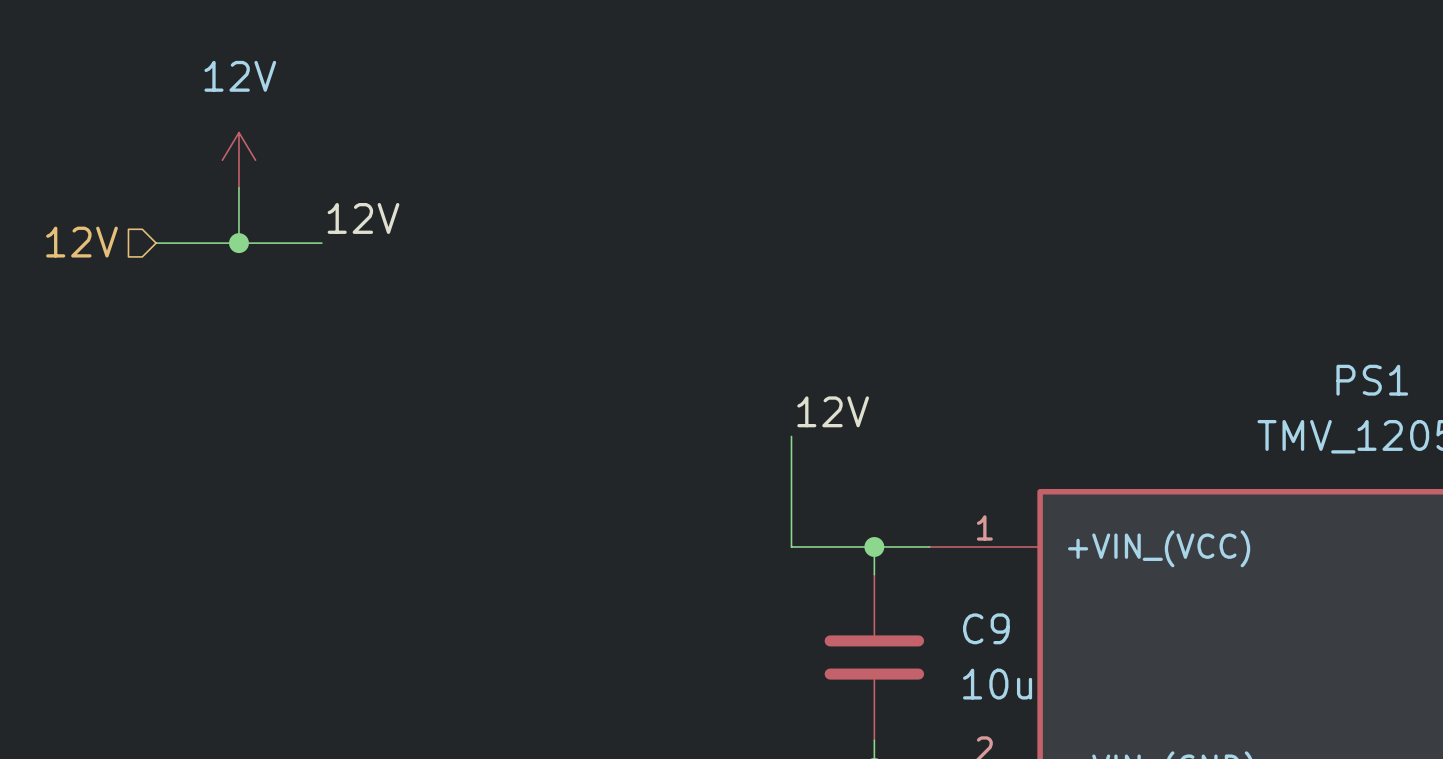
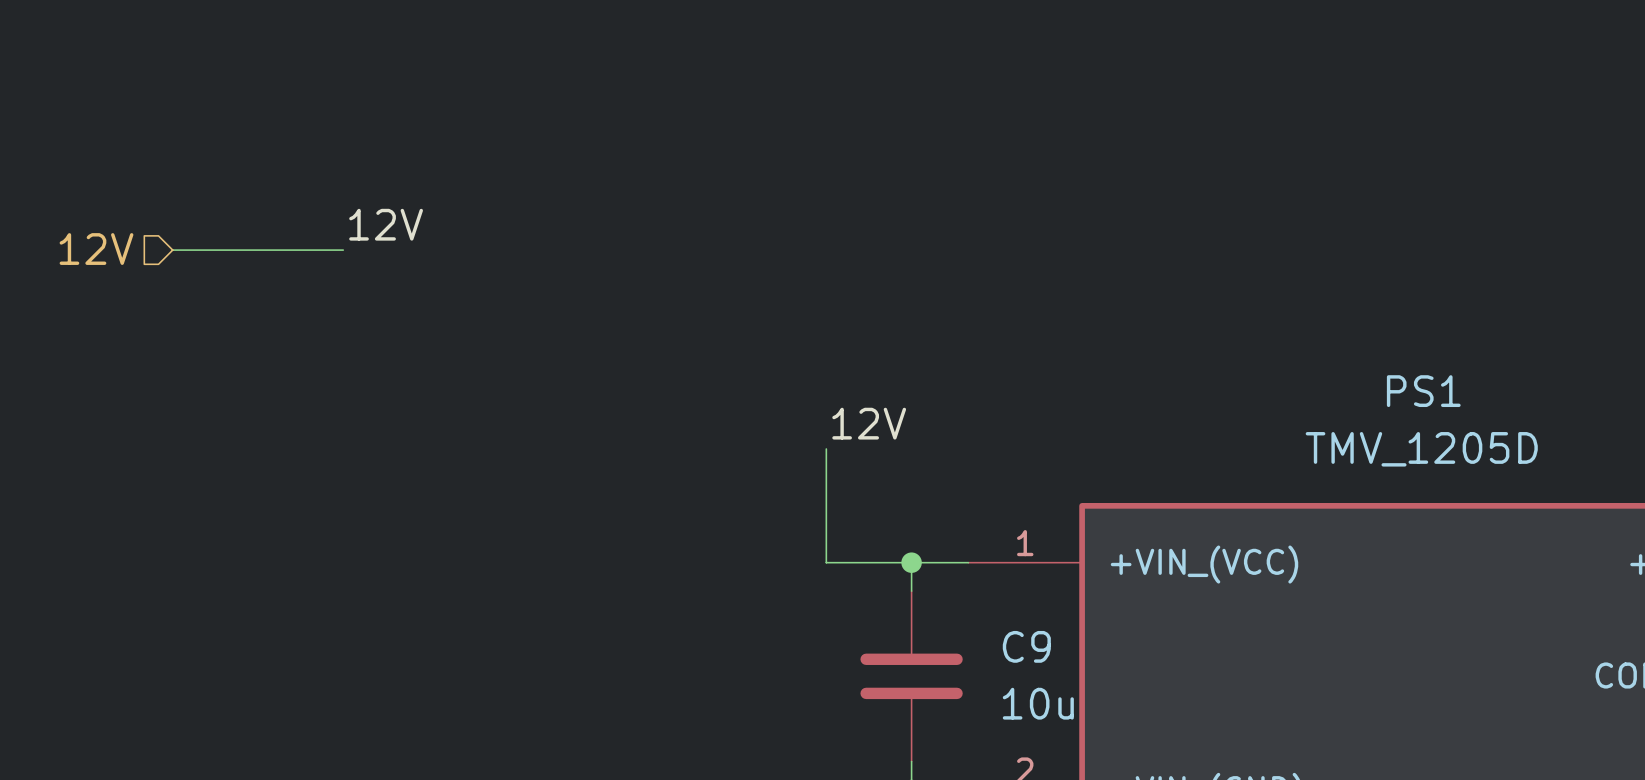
power symbol: 12V (238, 160) -> none
wire: (238, 187) (238, 243) -> none
junction: (238, 243) -> none

